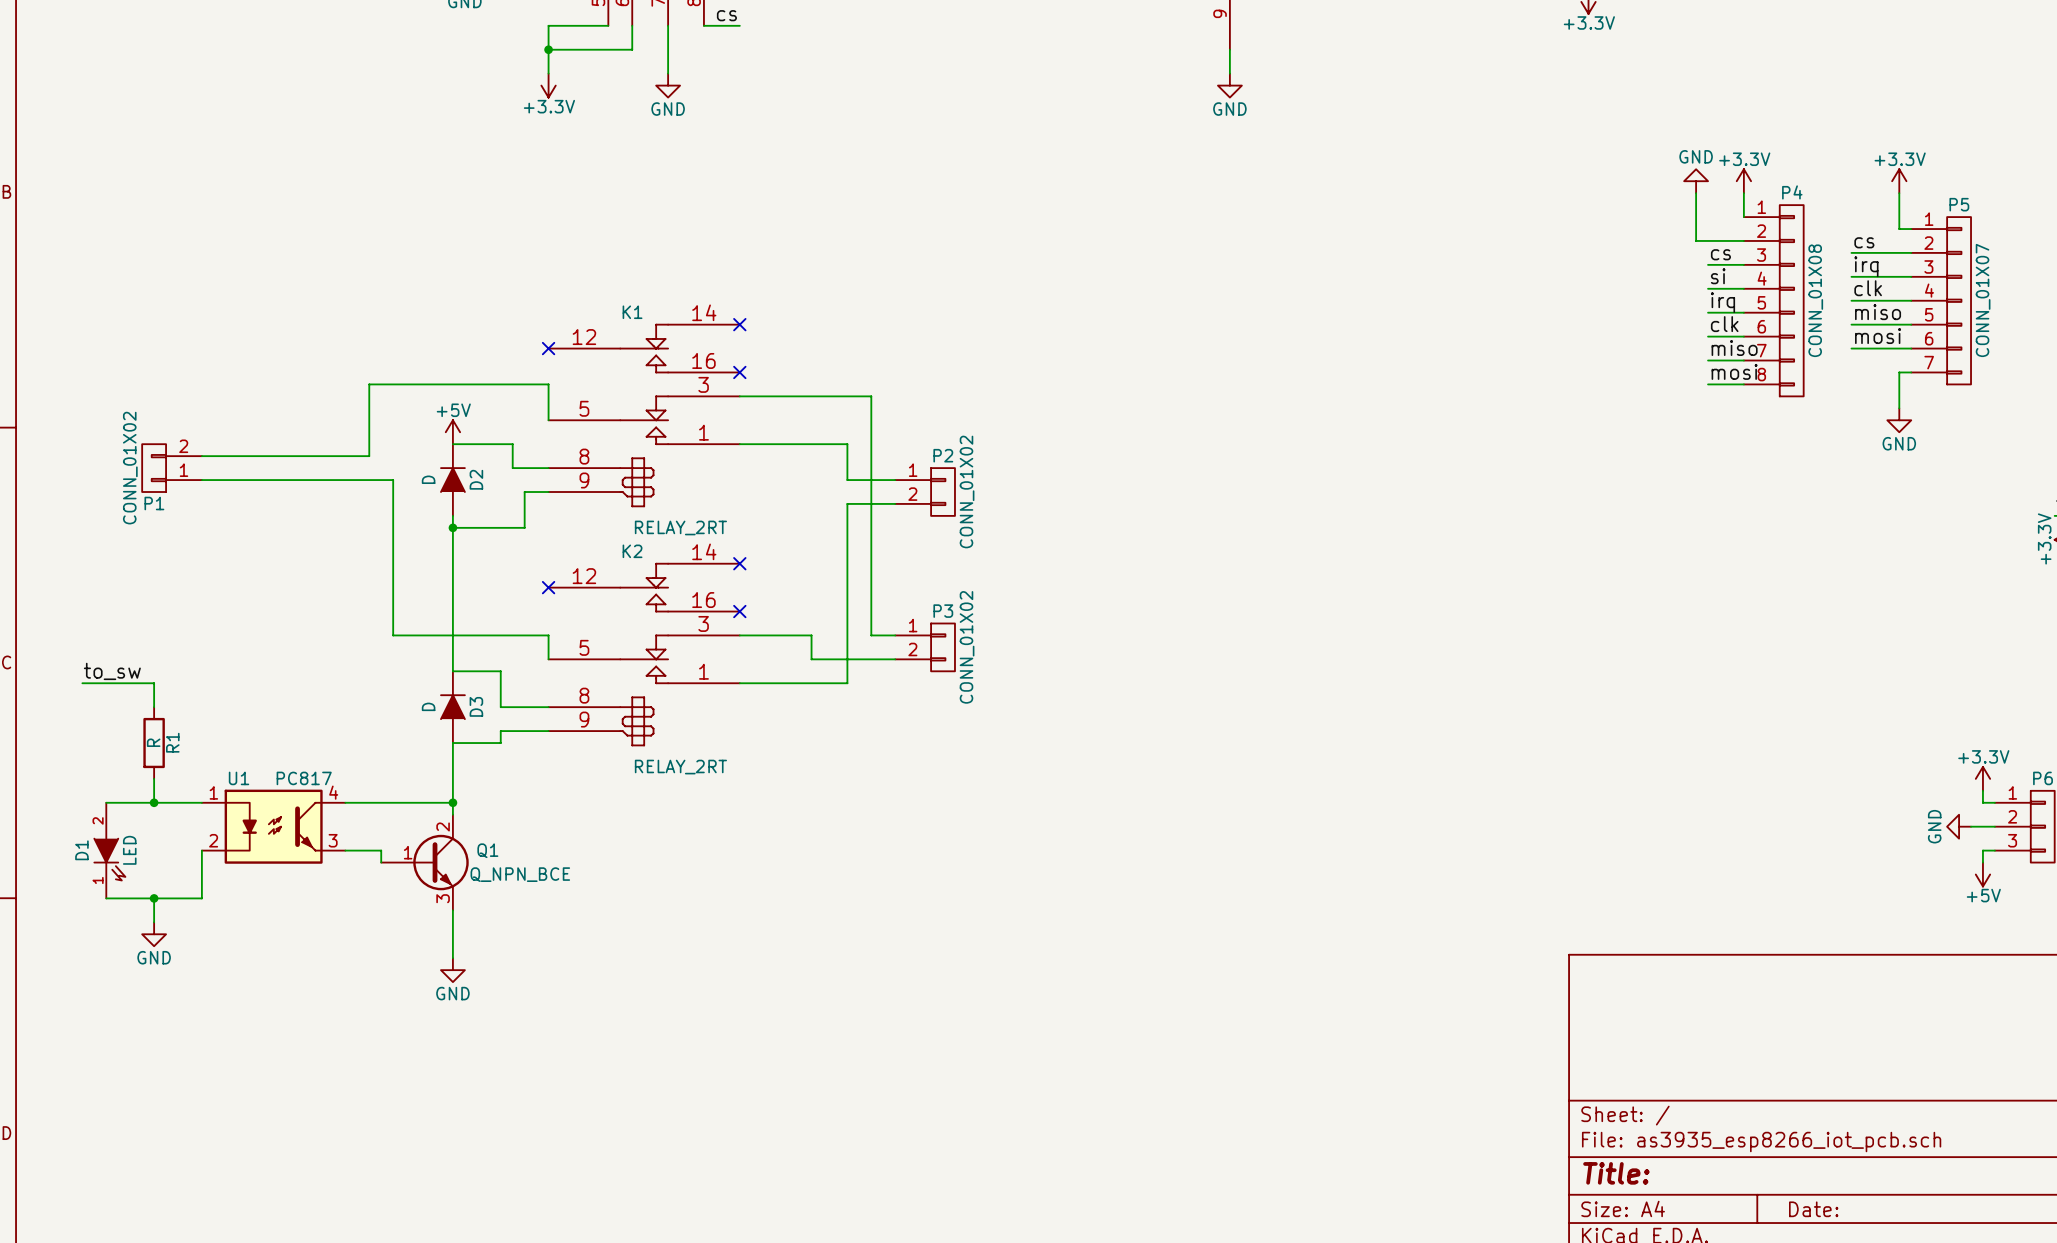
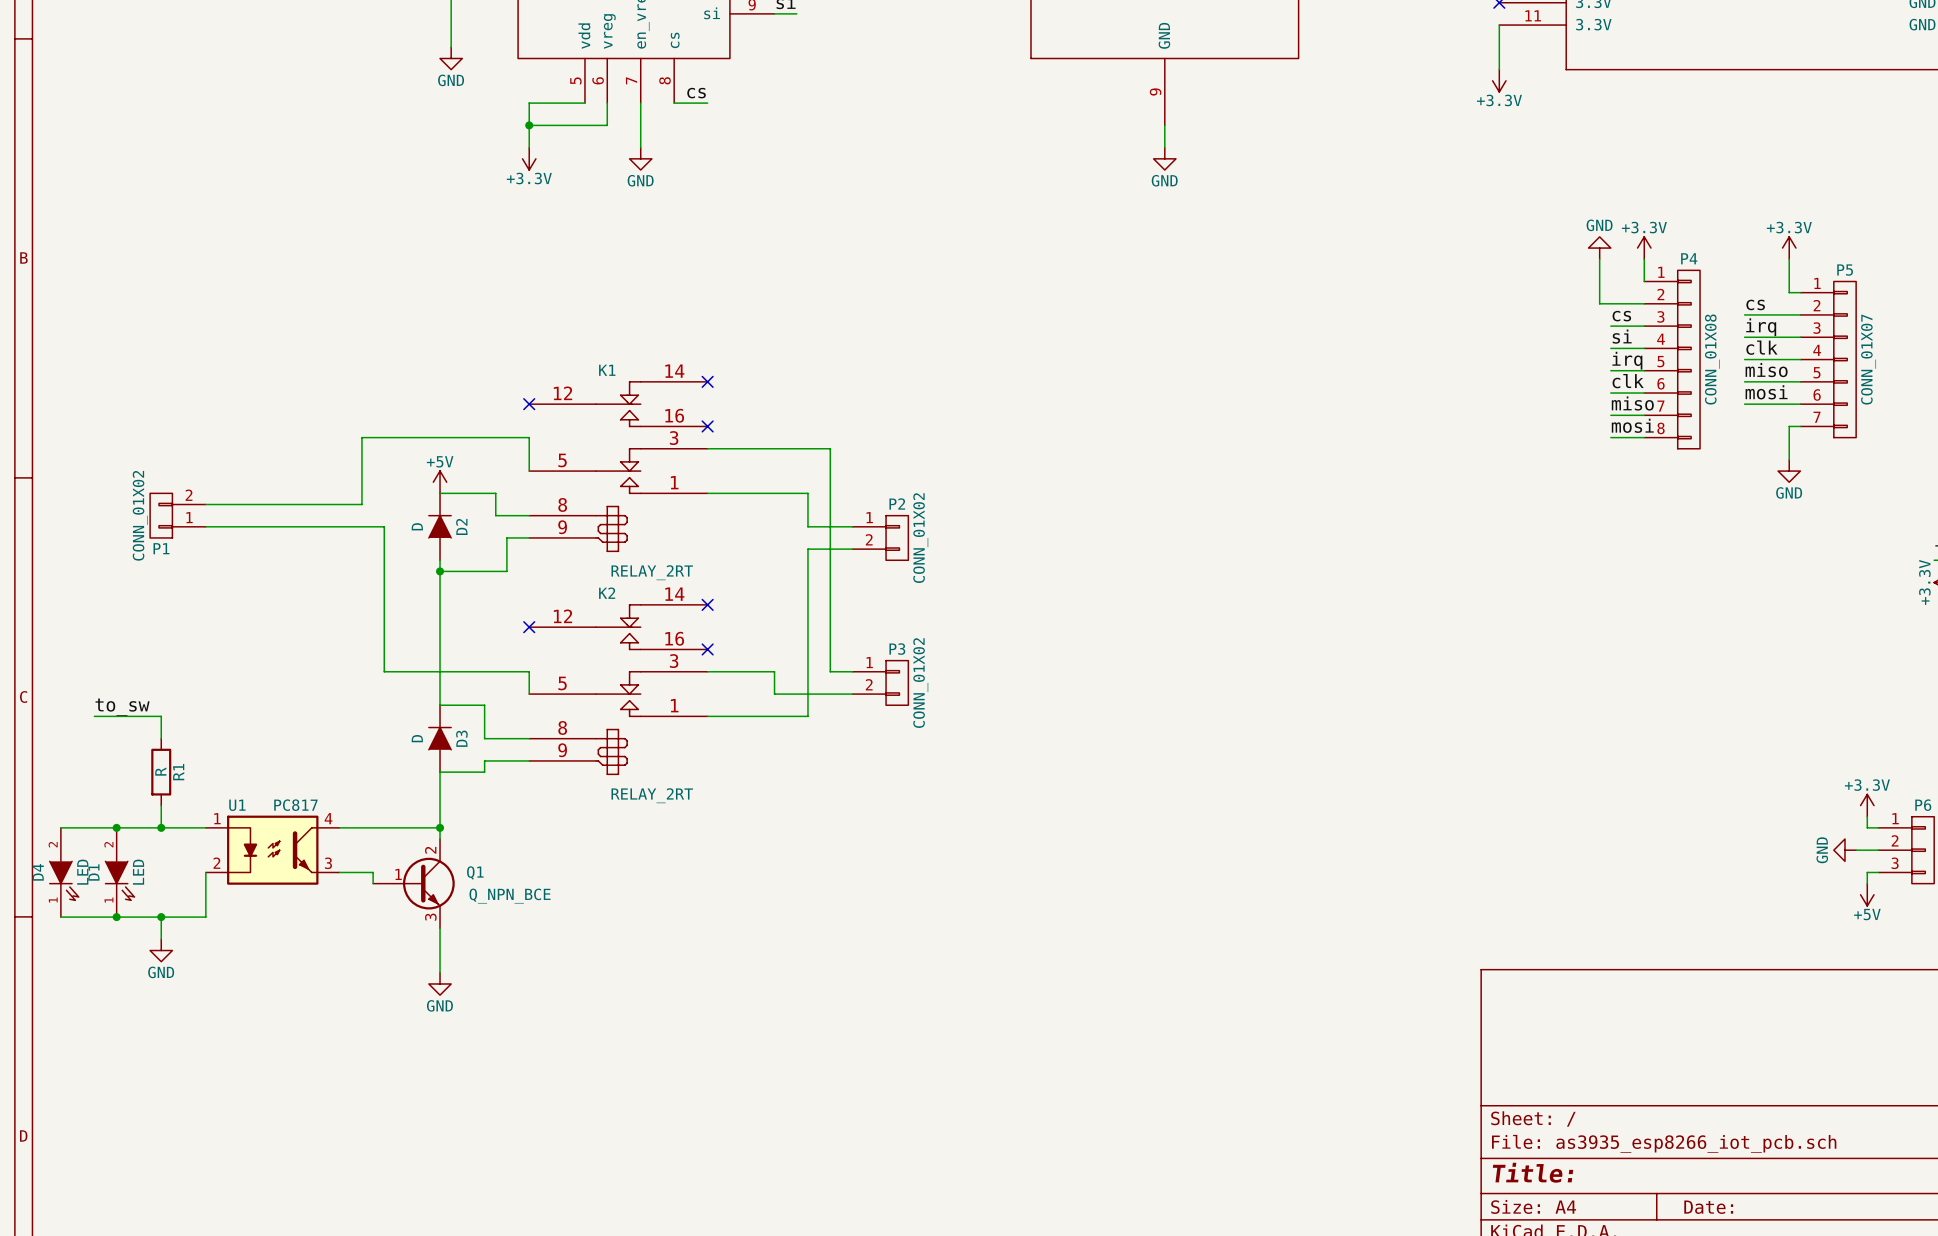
wire: none -> (60, 827) (116, 827)
junction: none -> (116, 827)
D4: none -> LED (64, 872)
wire: none -> (60, 917) (116, 917)
junction: none -> (116, 917)

